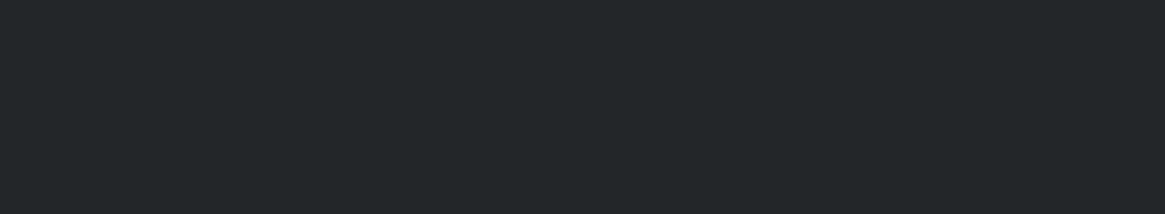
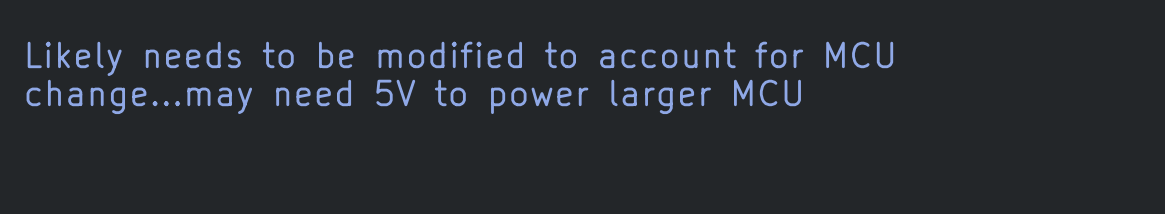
text: none -> Likely needs to be modified to account for MCU (460, 58)
text: none -> change...may need 5V to power larger MCU (413, 96)

